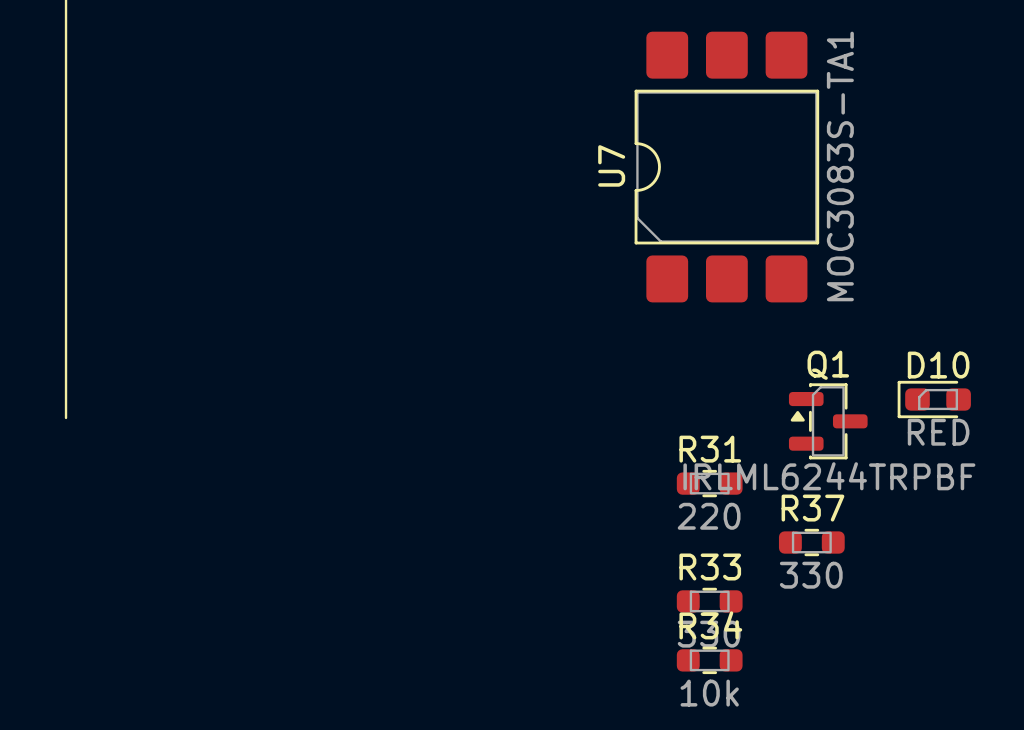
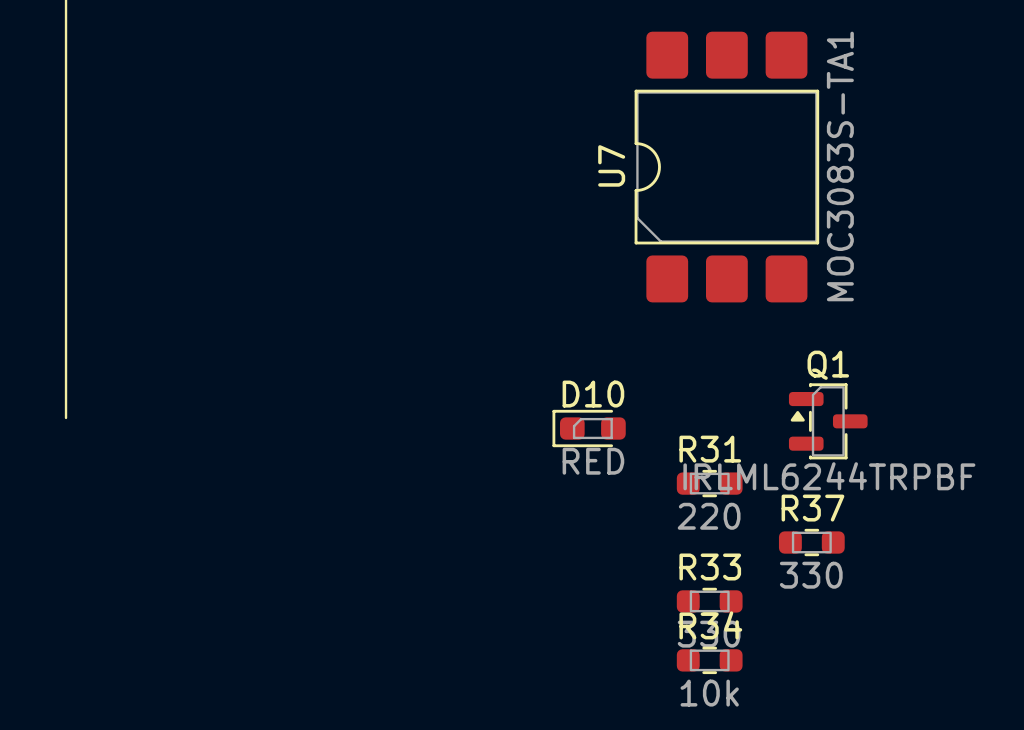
D10 position: (934, 399) -> (589, 428)

